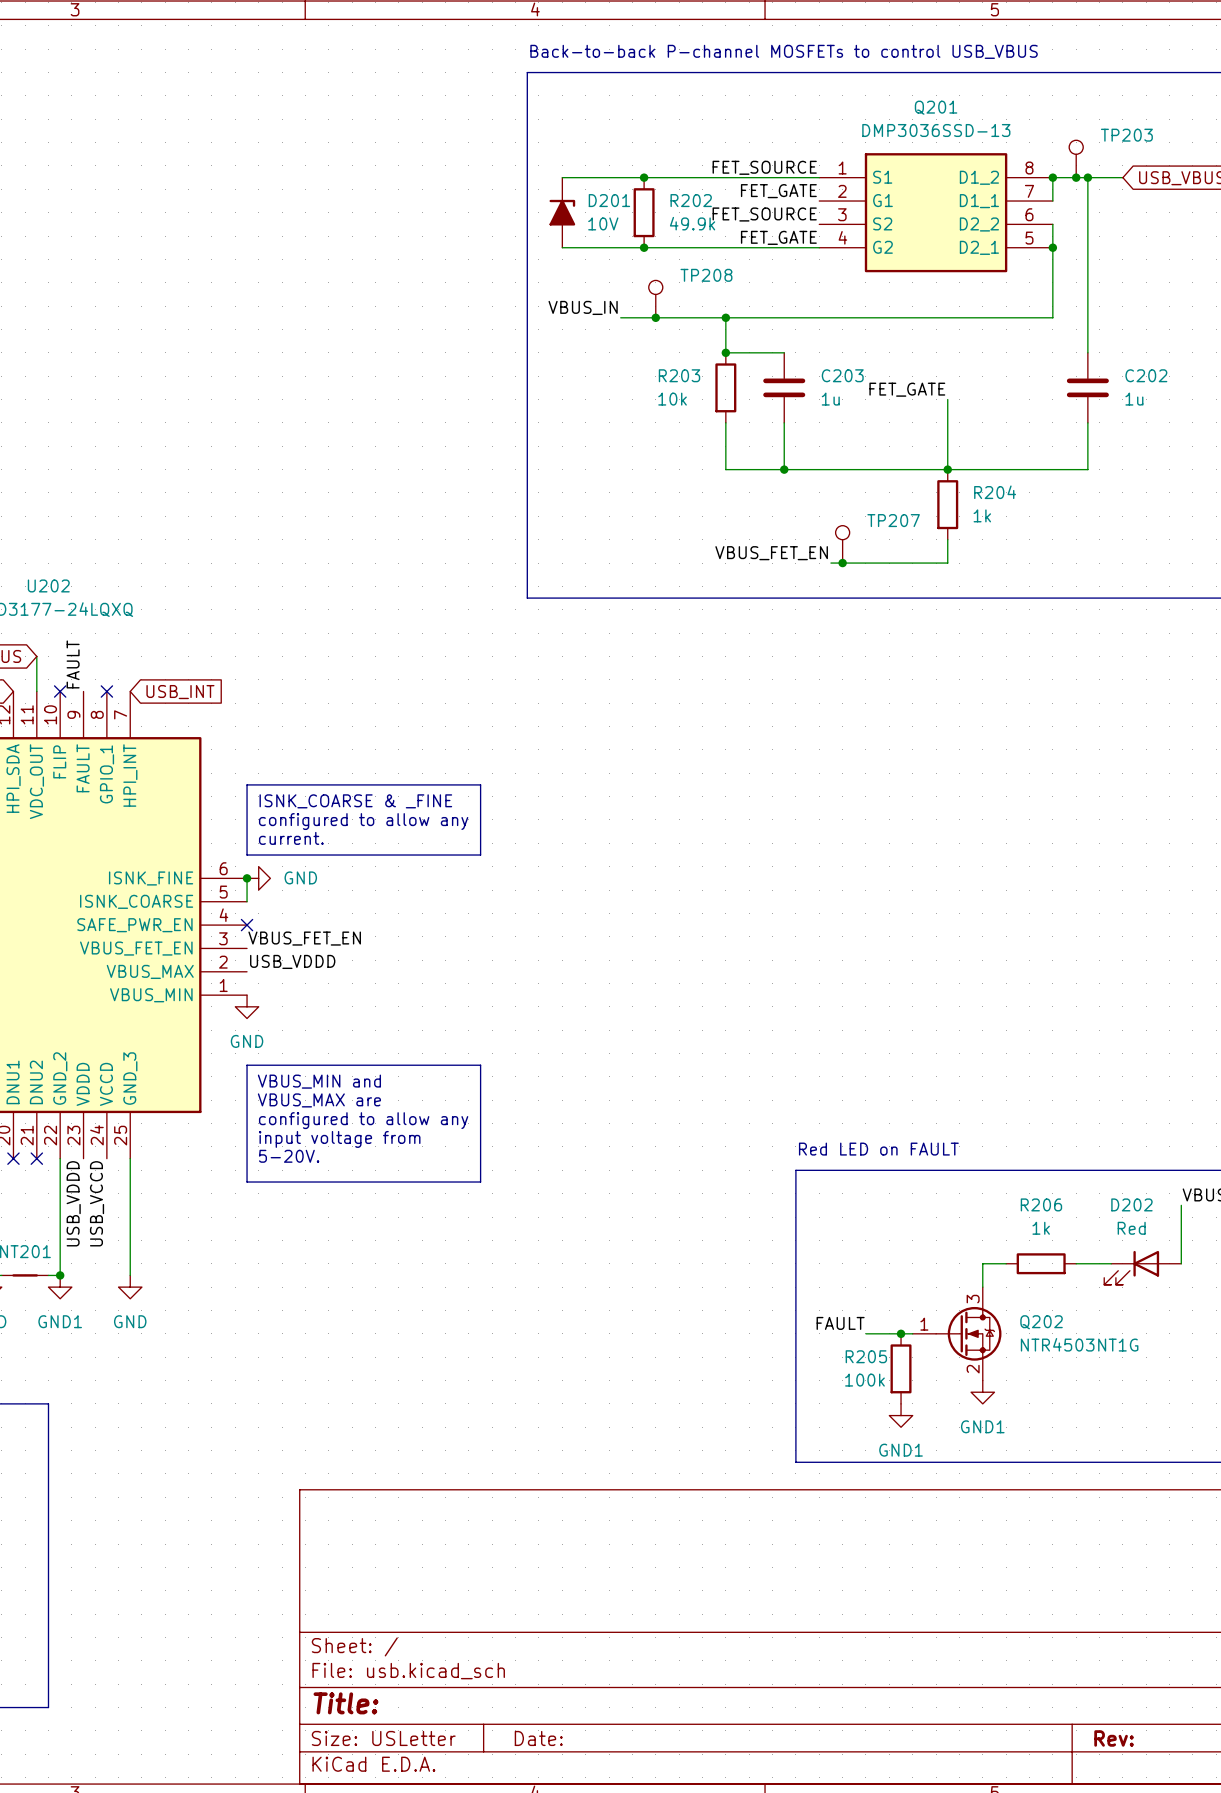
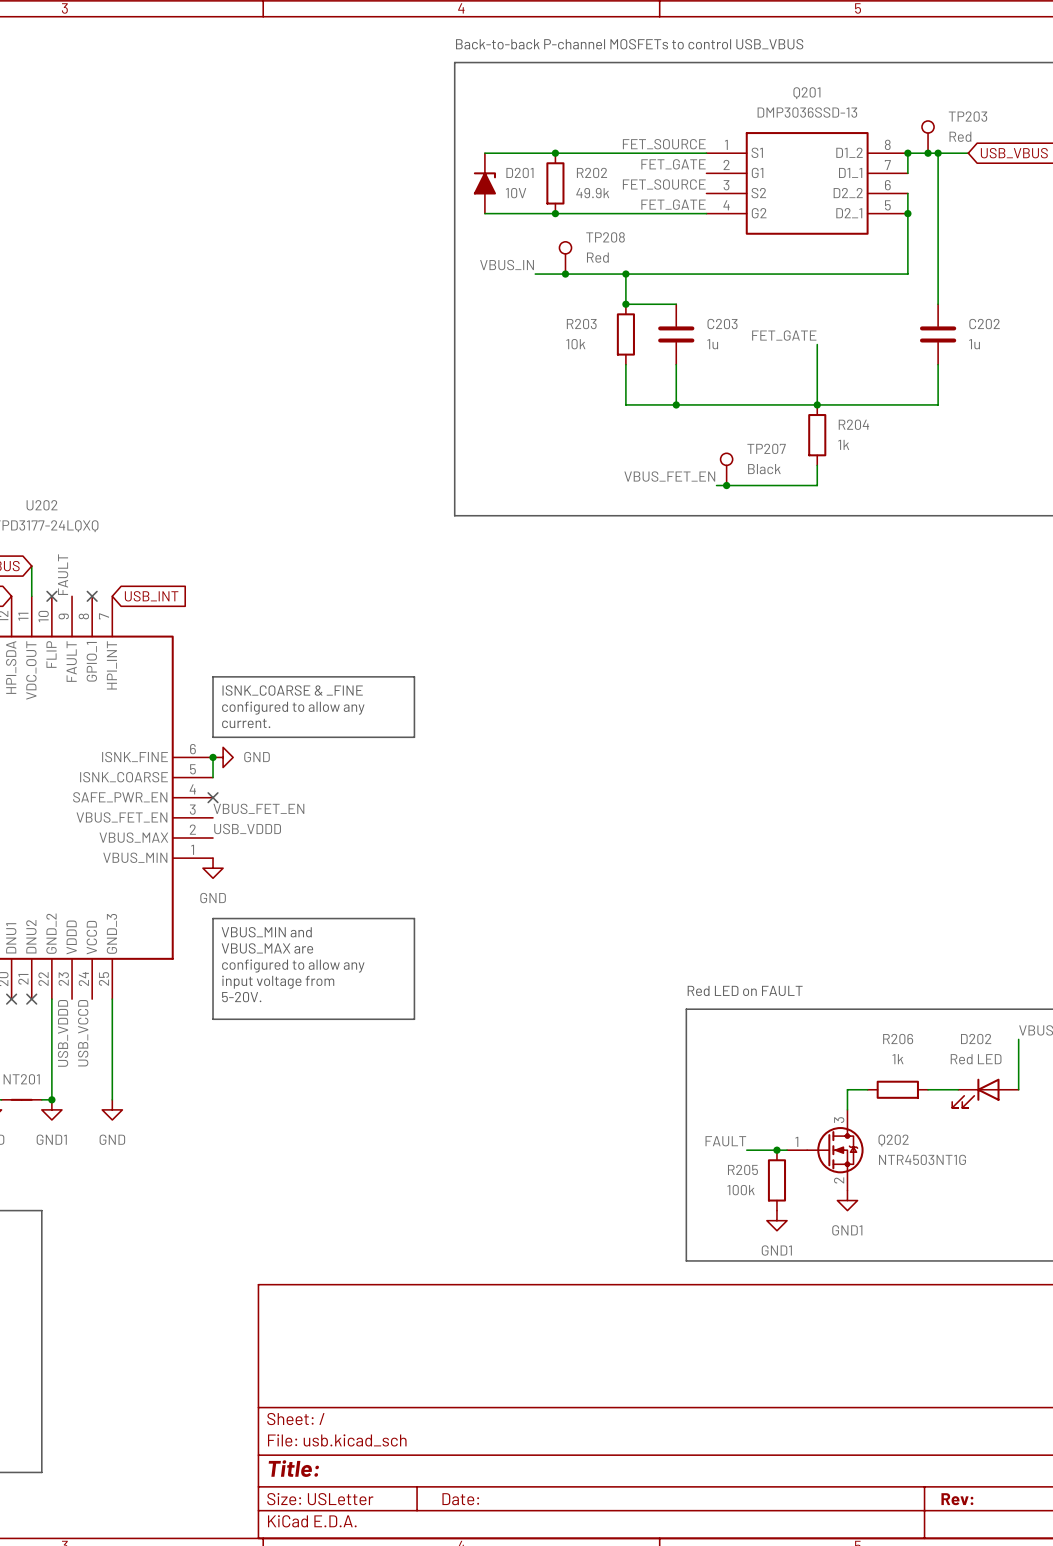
TP203 value: none -> Red (960, 136)
TP208 value: none -> Red (597, 257)
TP207 value: none -> Black (764, 469)
D202 value: Red (1131, 1228) -> Red LED (976, 1059)

